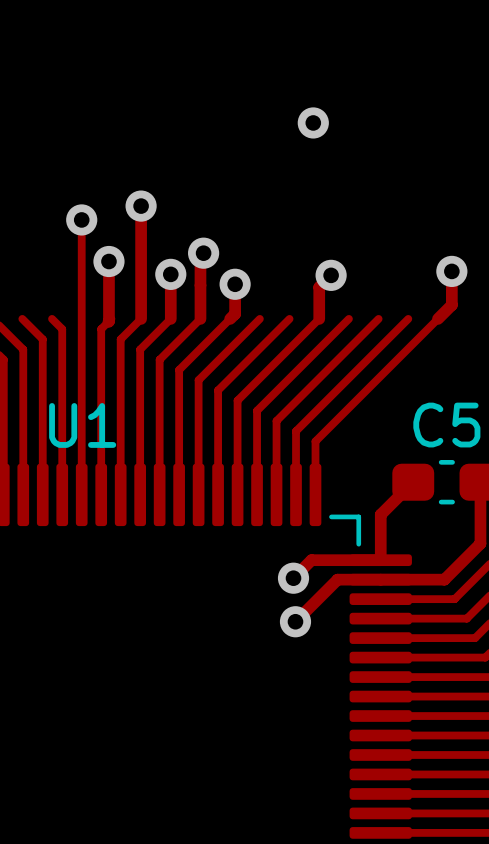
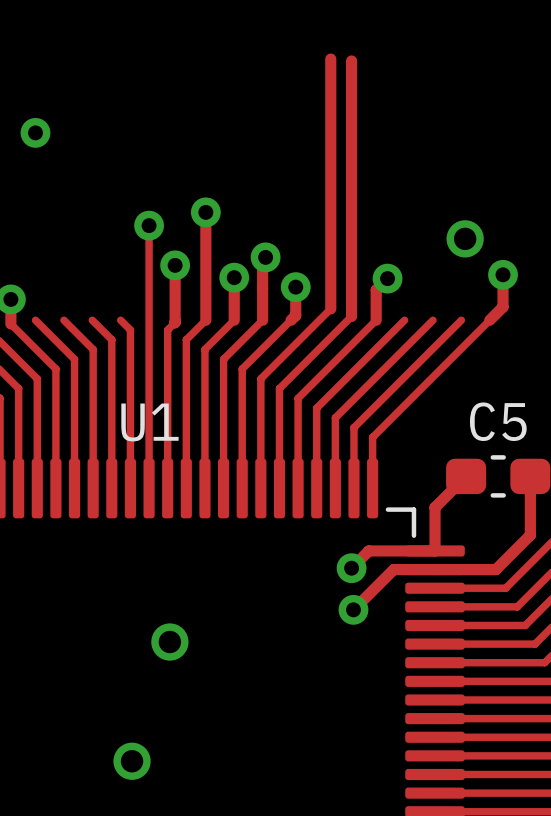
track: none -> (330, 59) (330, 308) (319, 320)
track: none -> (351, 60) (351, 316) (347, 320)
via: (313, 122) -> none
via: none -> (465, 238)
via: none -> (169, 642)
via: none -> (132, 761)

